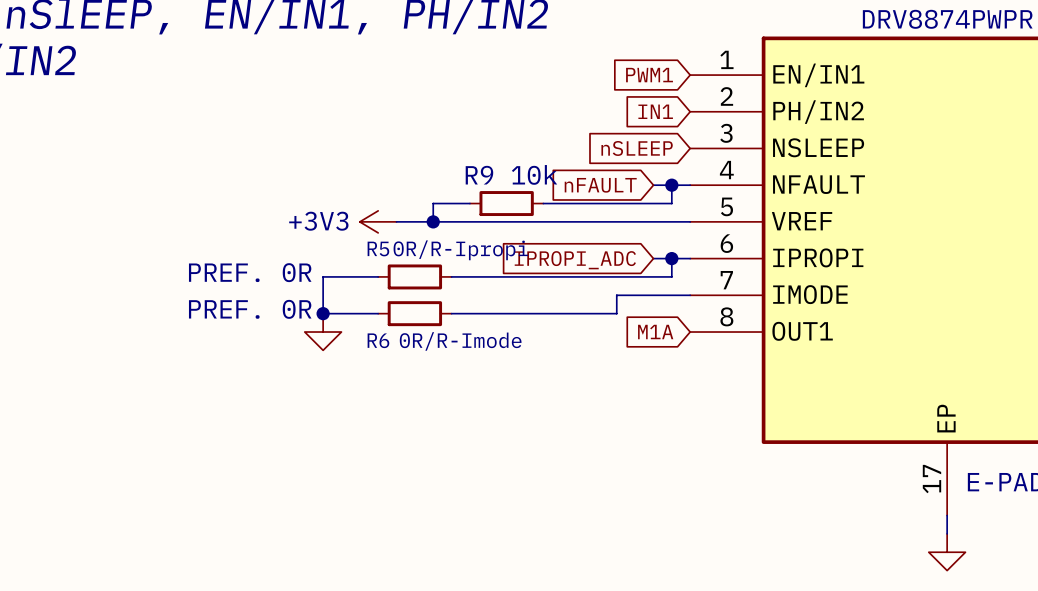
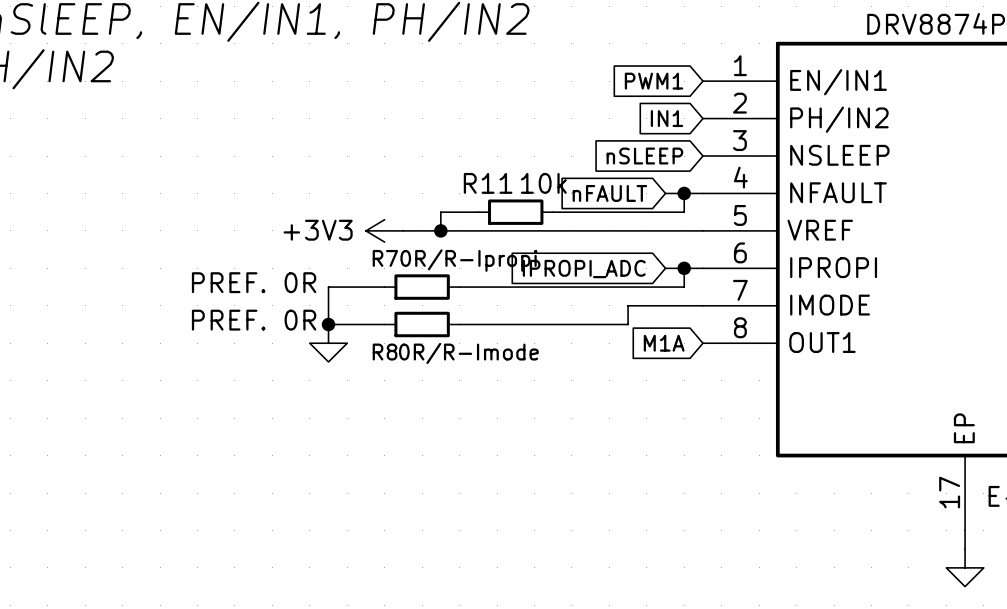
R9 name: R9 (479, 175) -> R11 (488, 183)
R5 name: R5 (378, 249) -> R7 (385, 258)
R6 name: R6 (378, 340) -> R8 (385, 352)

